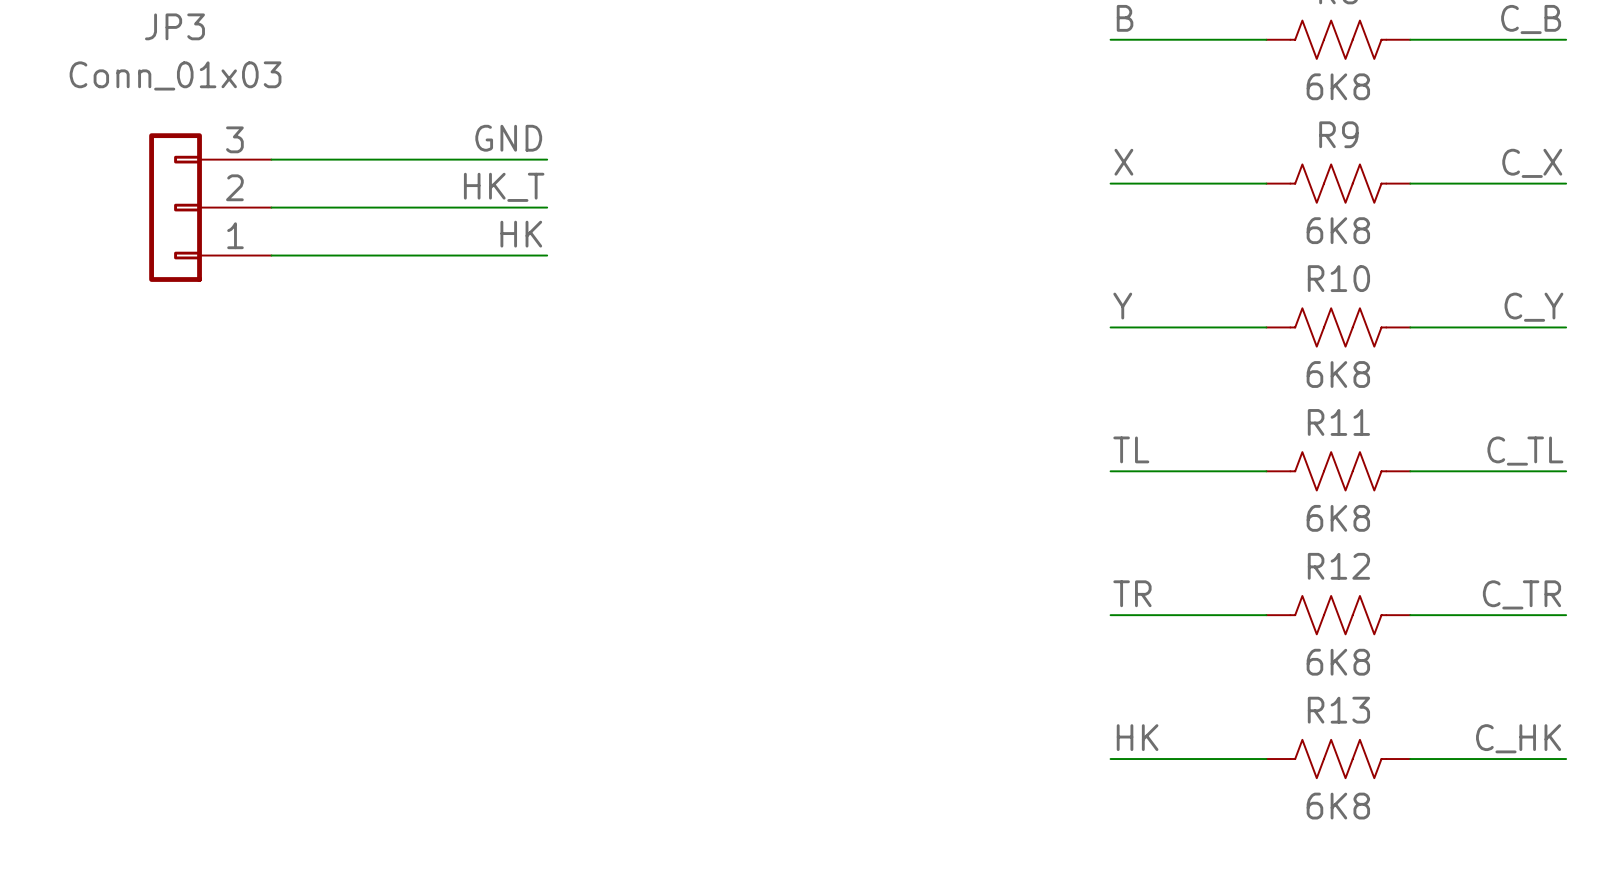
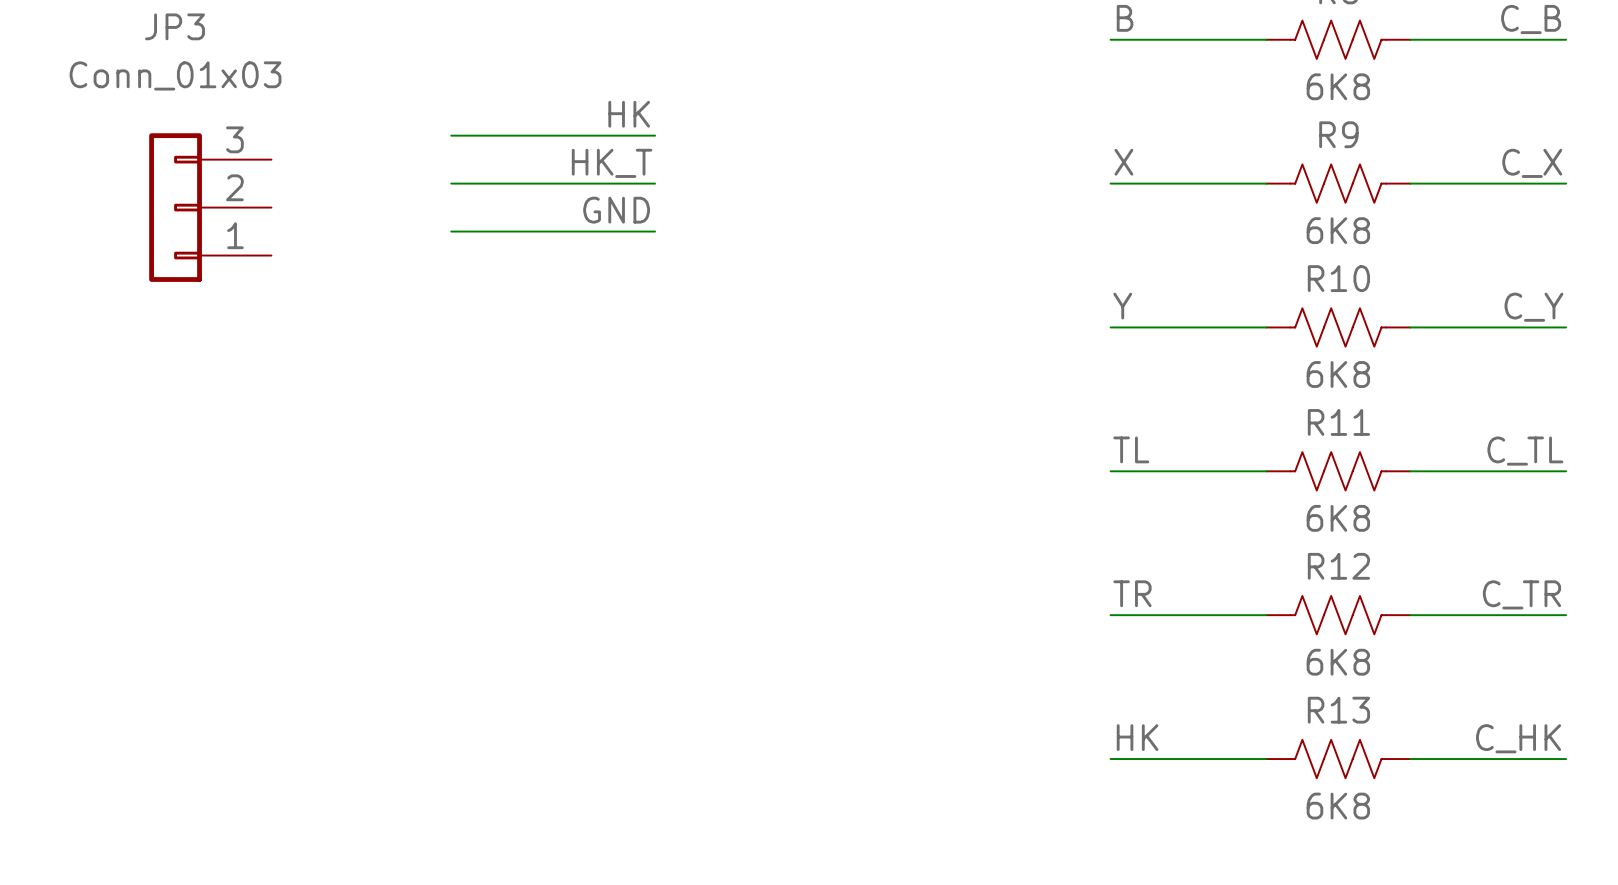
wire: none -> (451, 135) (655, 135)
label position: GND (508, 138) -> GND (616, 210)
wire: (271, 159) (547, 159) -> none
wire: none -> (451, 183) (655, 183)
label position: HK_T (504, 187) -> HK_T (612, 163)
wire: (271, 207) (547, 207) -> none
wire: none -> (451, 231) (655, 231)
label position: HK (521, 234) -> HK (629, 114)
wire: (271, 255) (547, 255) -> none

